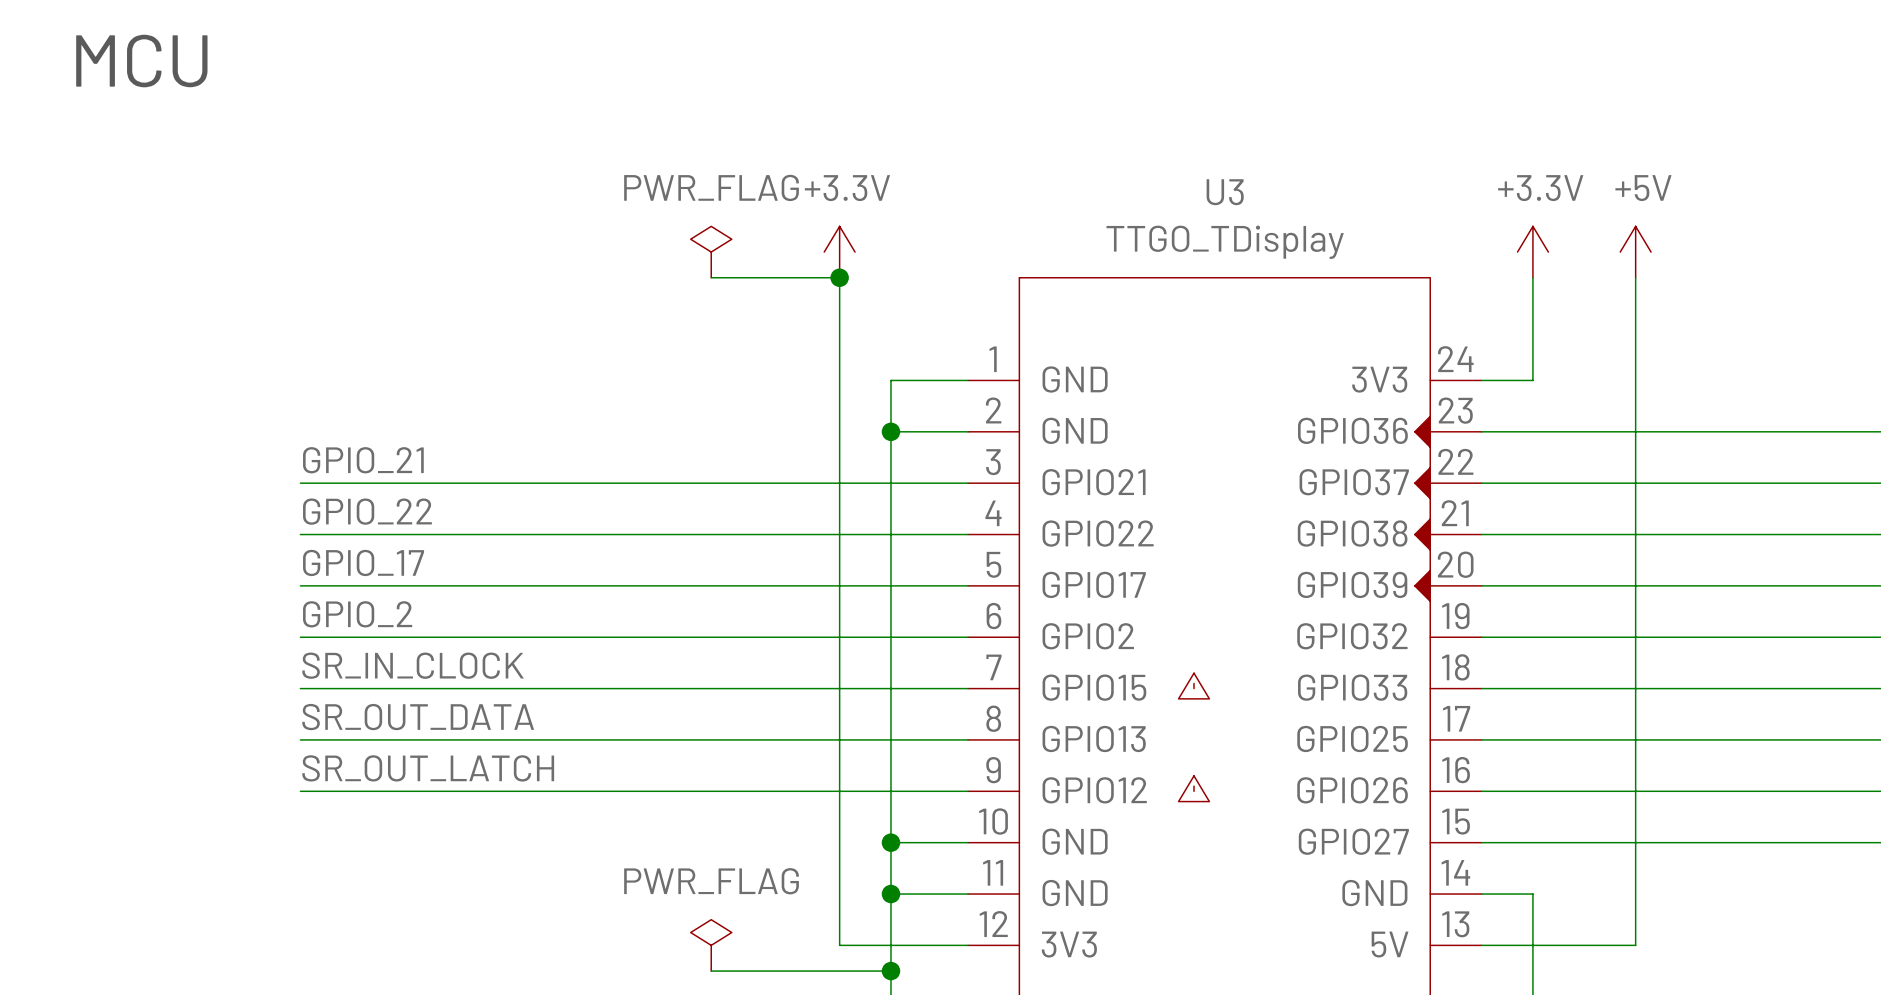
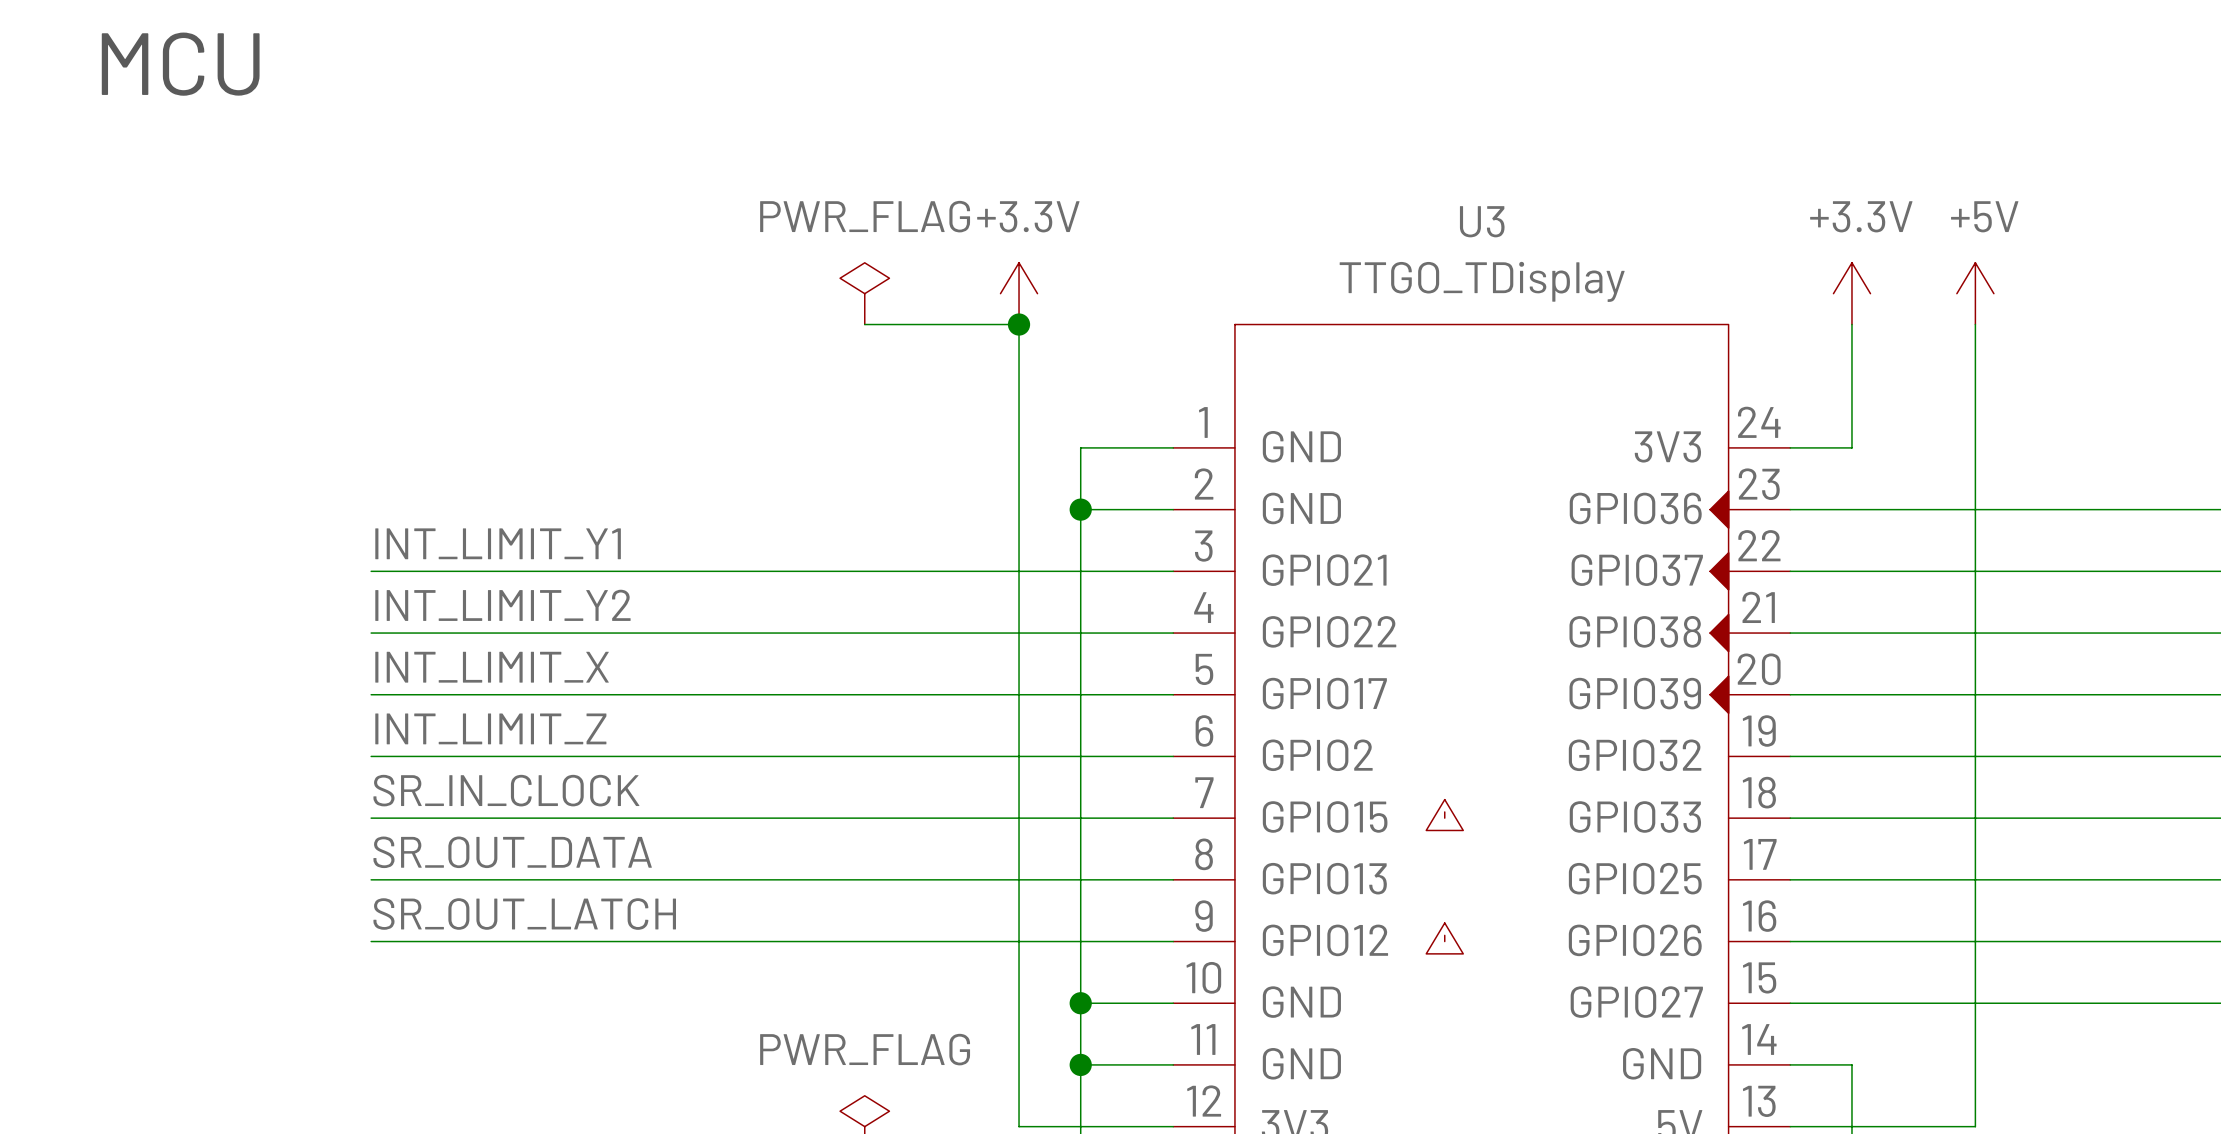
label: GPIO_21 (363, 460) -> INT_LIMIT_Y1 (498, 543)
label: GPIO_22 (367, 511) -> INT_LIMIT_Y2 (502, 605)
label: GPIO_17 (363, 562) -> INT_LIMIT_X (492, 667)
label: GPIO_2 (357, 614) -> INT_LIMIT_Z (490, 728)

